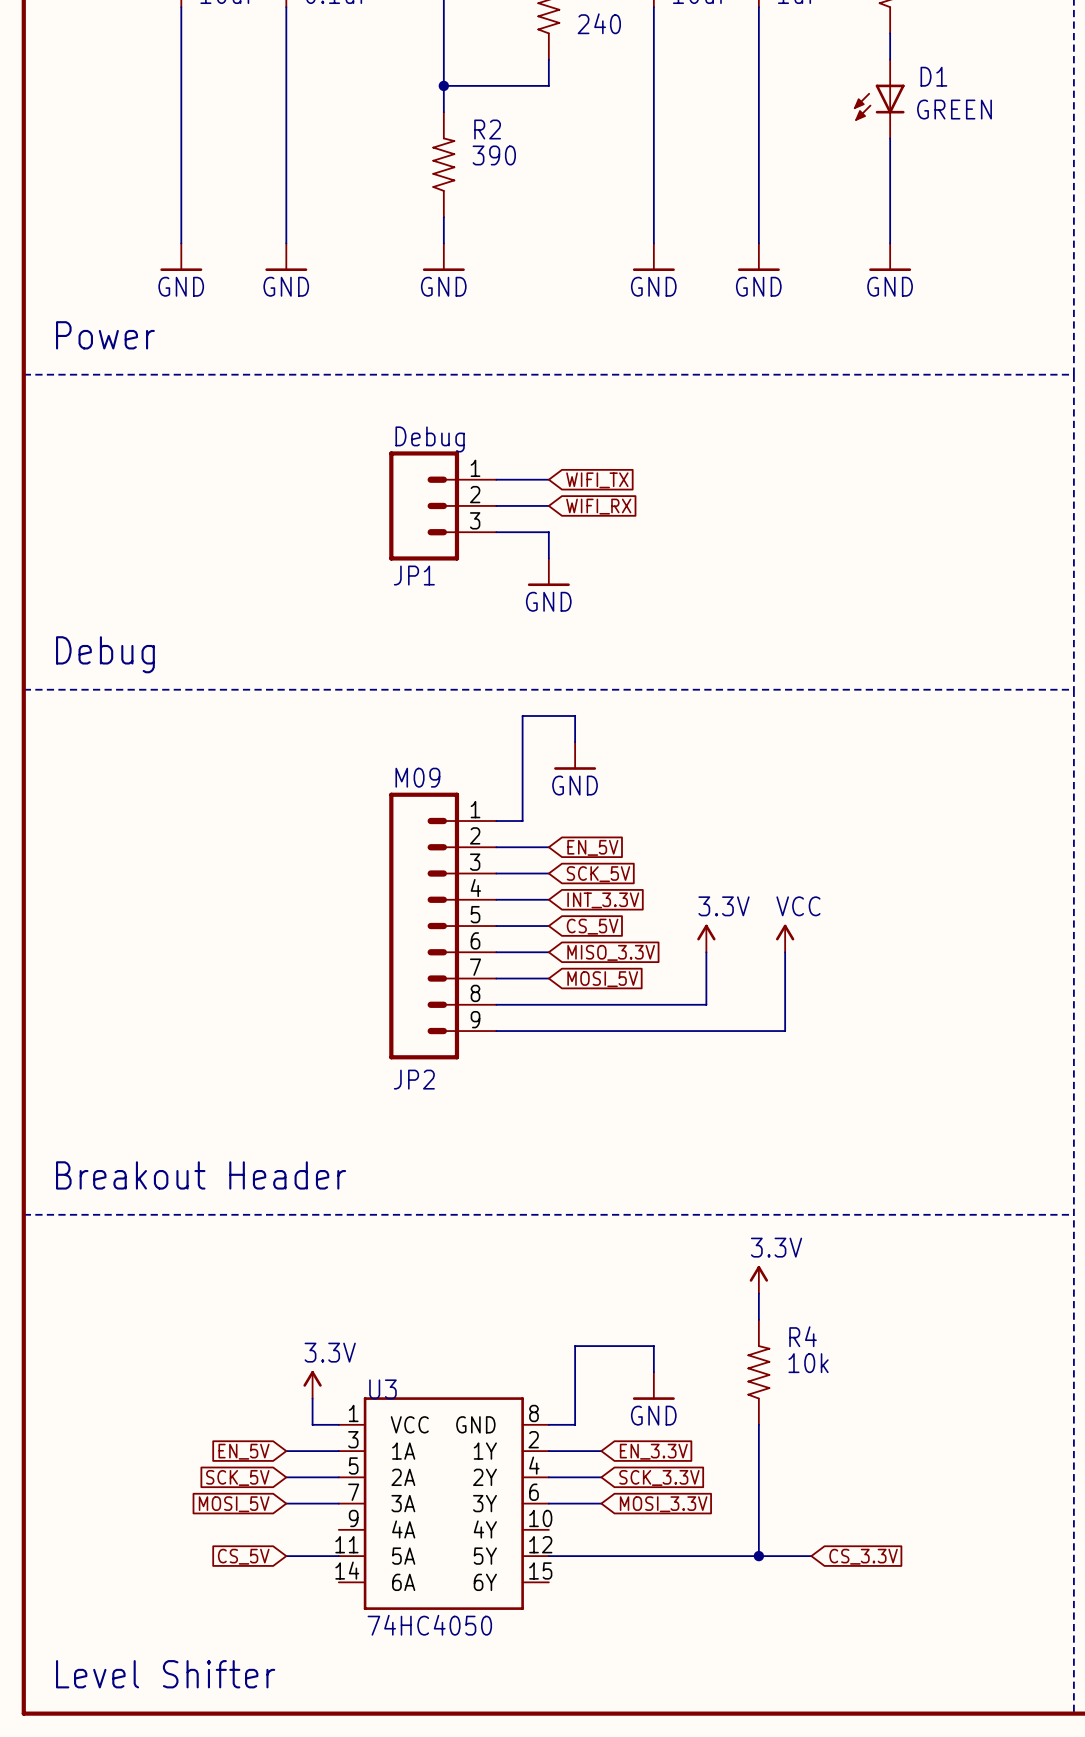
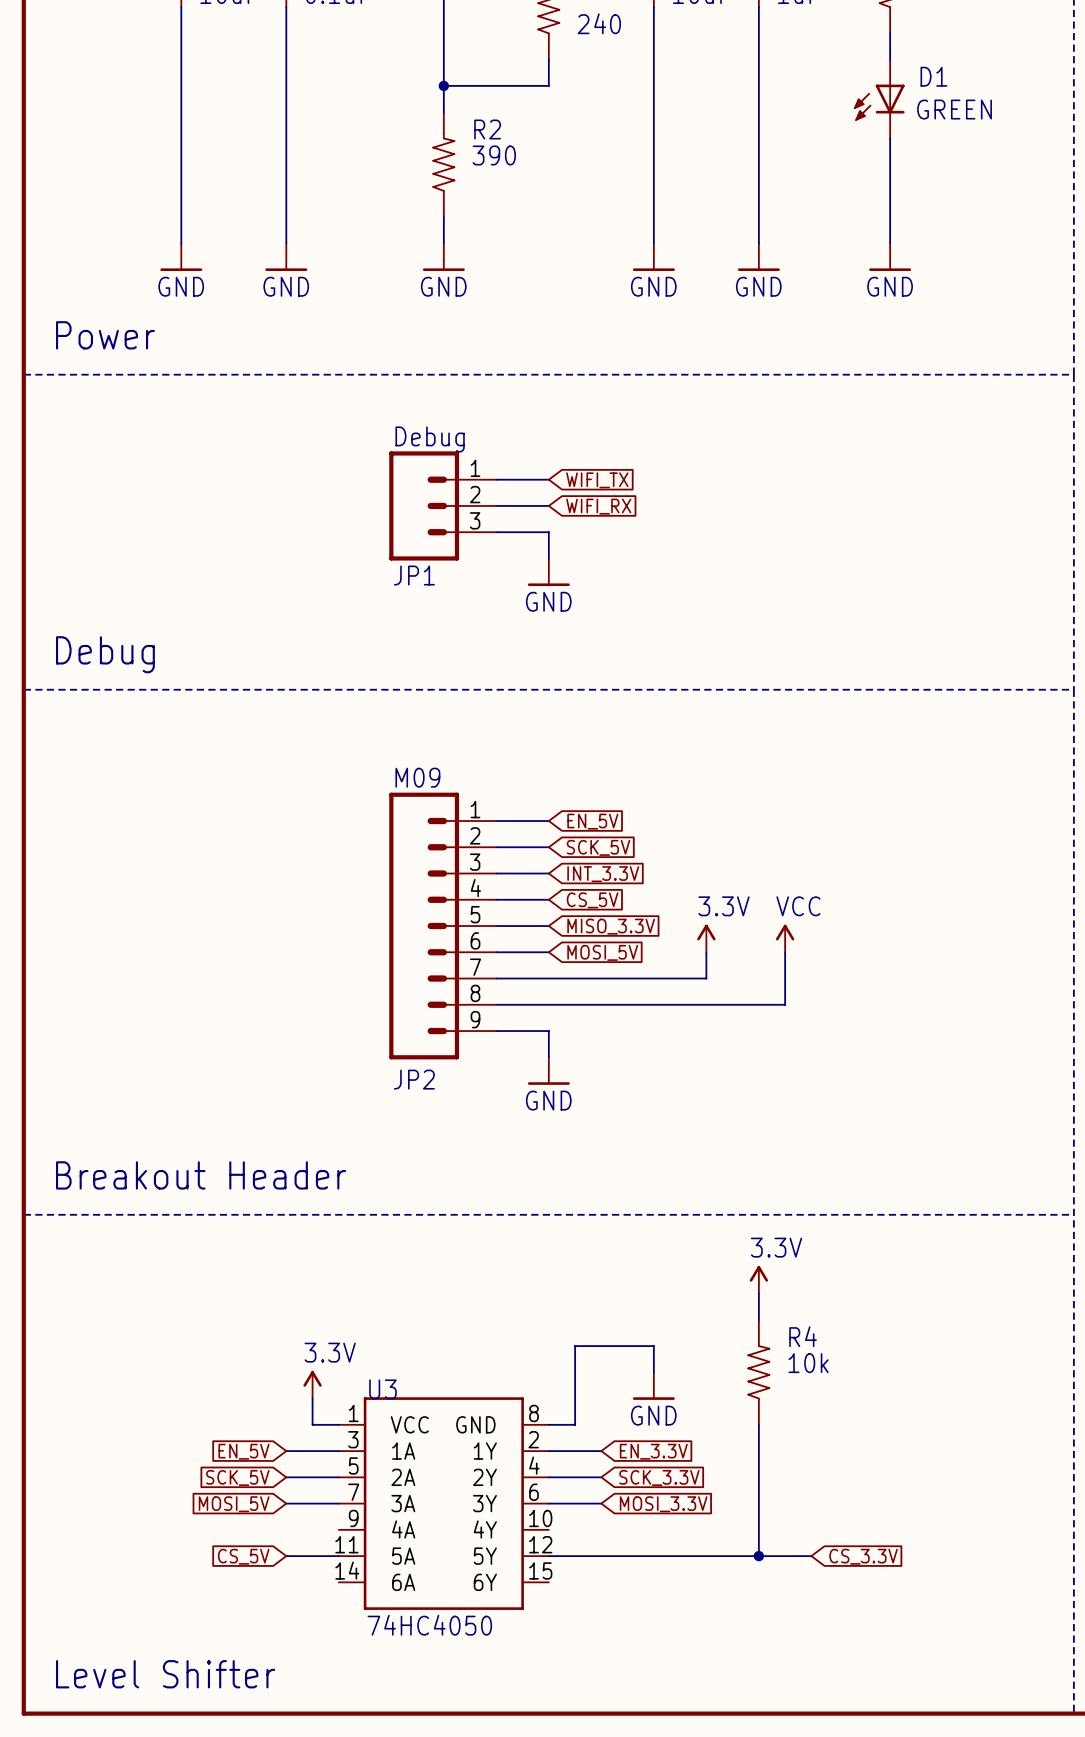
wire: (575, 742) (575, 715) (522, 715) (522, 821) -> (548, 821) (522, 821)
power symbol: GND (575, 756) -> none
global label: none -> EN_5V (592, 821)
global label: EN_5V (592, 847) -> SCK_5V (598, 847)
global label: SCK_5V (598, 874) -> INT_3.3V (603, 874)
global label: INT_3.3V (603, 900) -> CS_5V (592, 900)
global label: CS_5V (592, 926) -> MISO_3.3V (611, 926)
global label: MISO_3.3V (611, 952) -> MOSI_5V (602, 952)
wire: none -> (548, 978) (706, 978)
wire: (706, 978) (706, 1004) -> (785, 1004) (706, 1004)
global label: MOSI_5V (602, 979) -> none
wire: (785, 1004) (785, 1031) (548, 1031) -> (548, 1057) (548, 1031)
power symbol: none -> GND (548, 1071)

